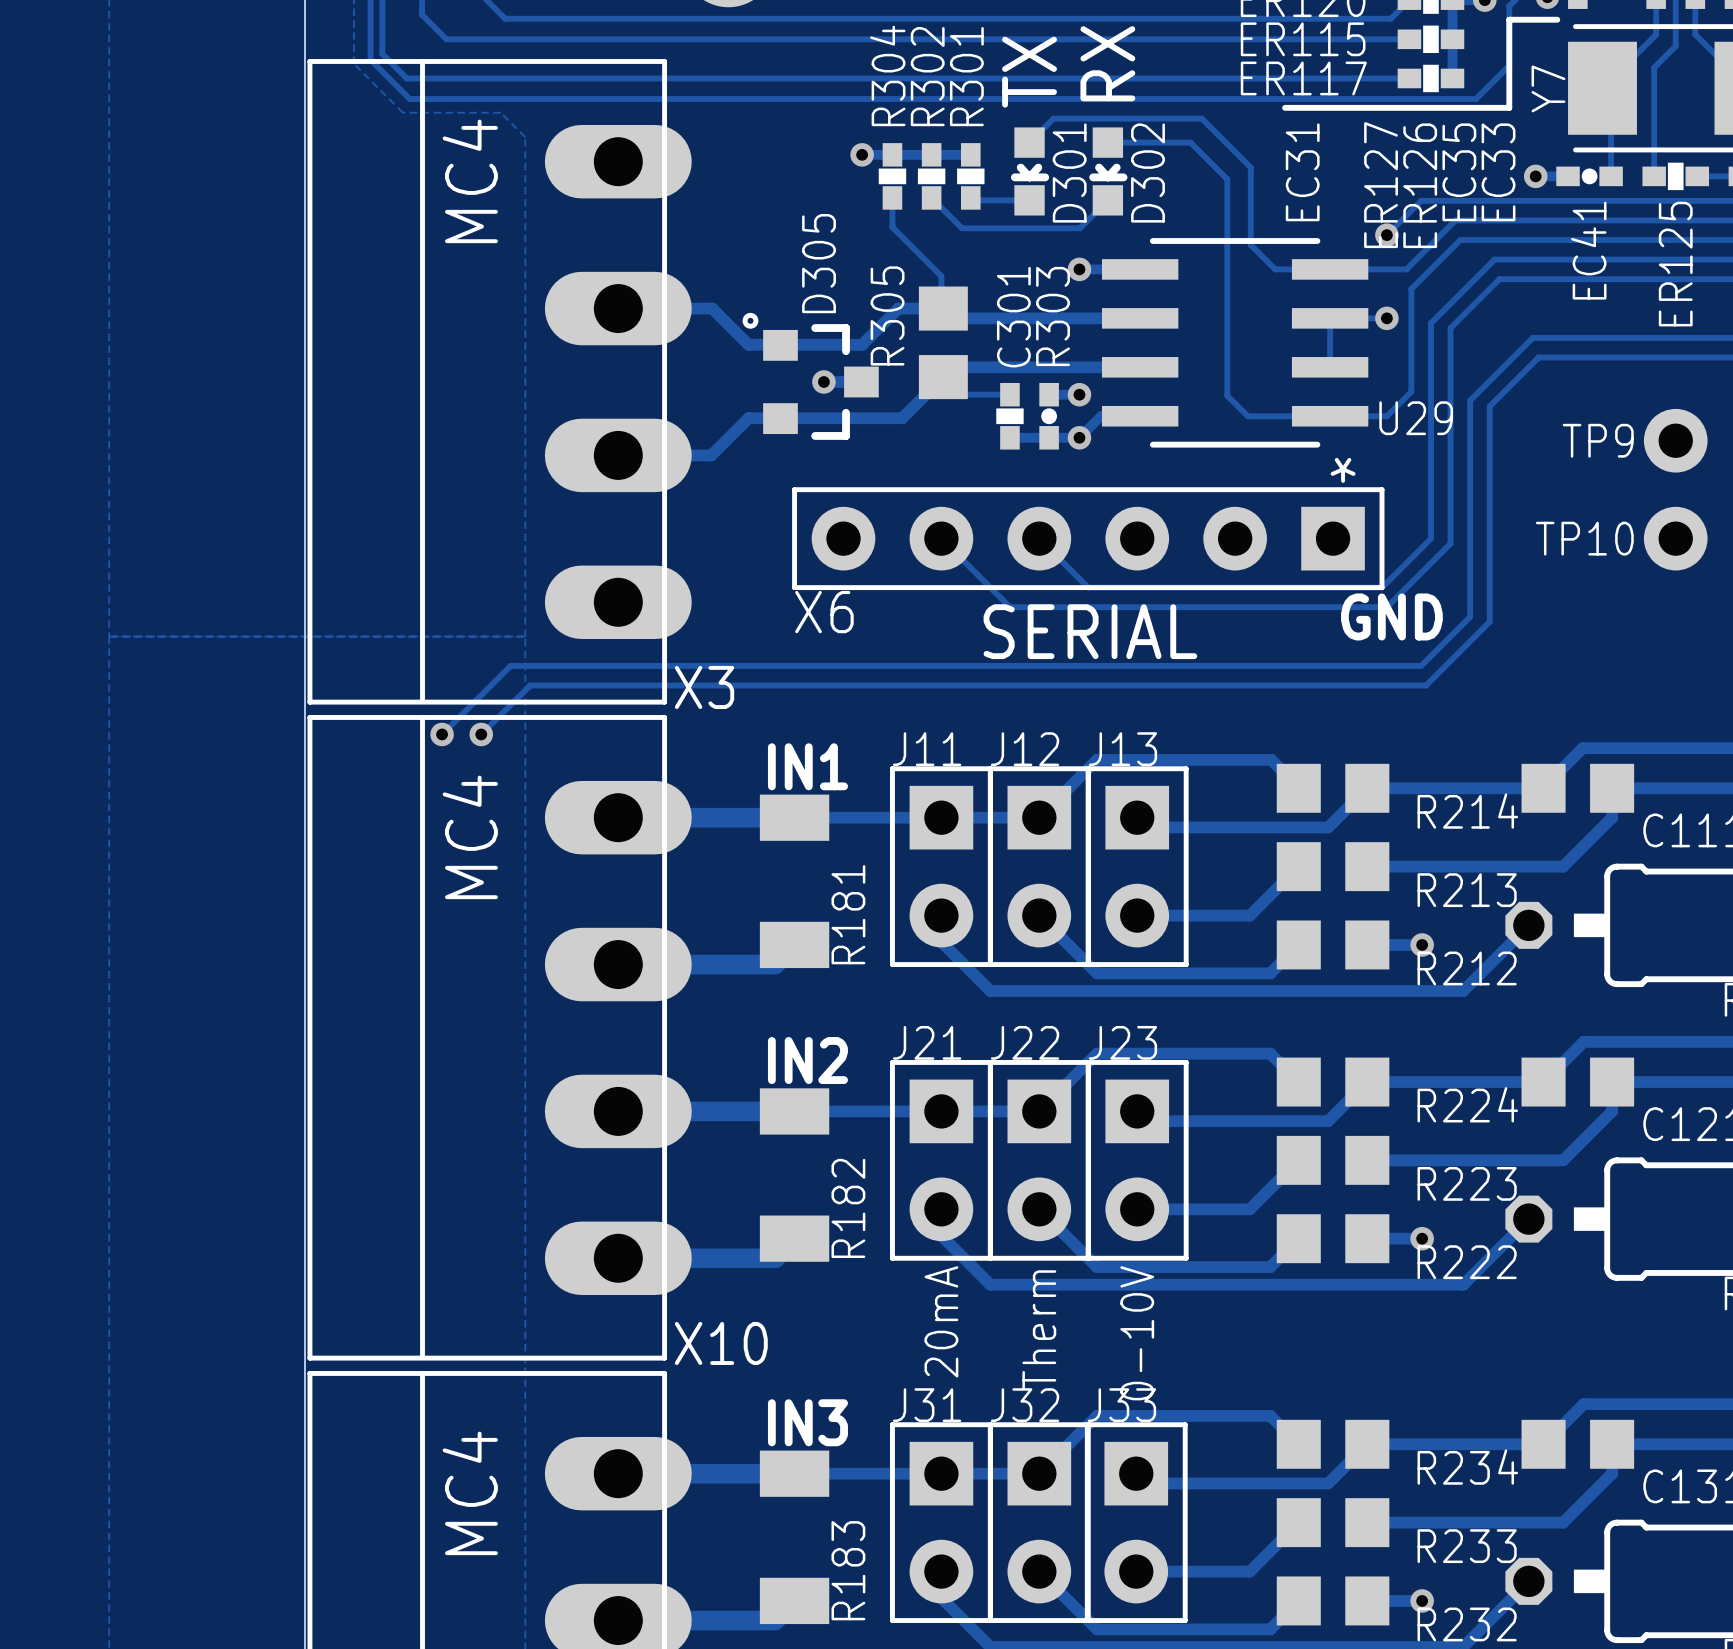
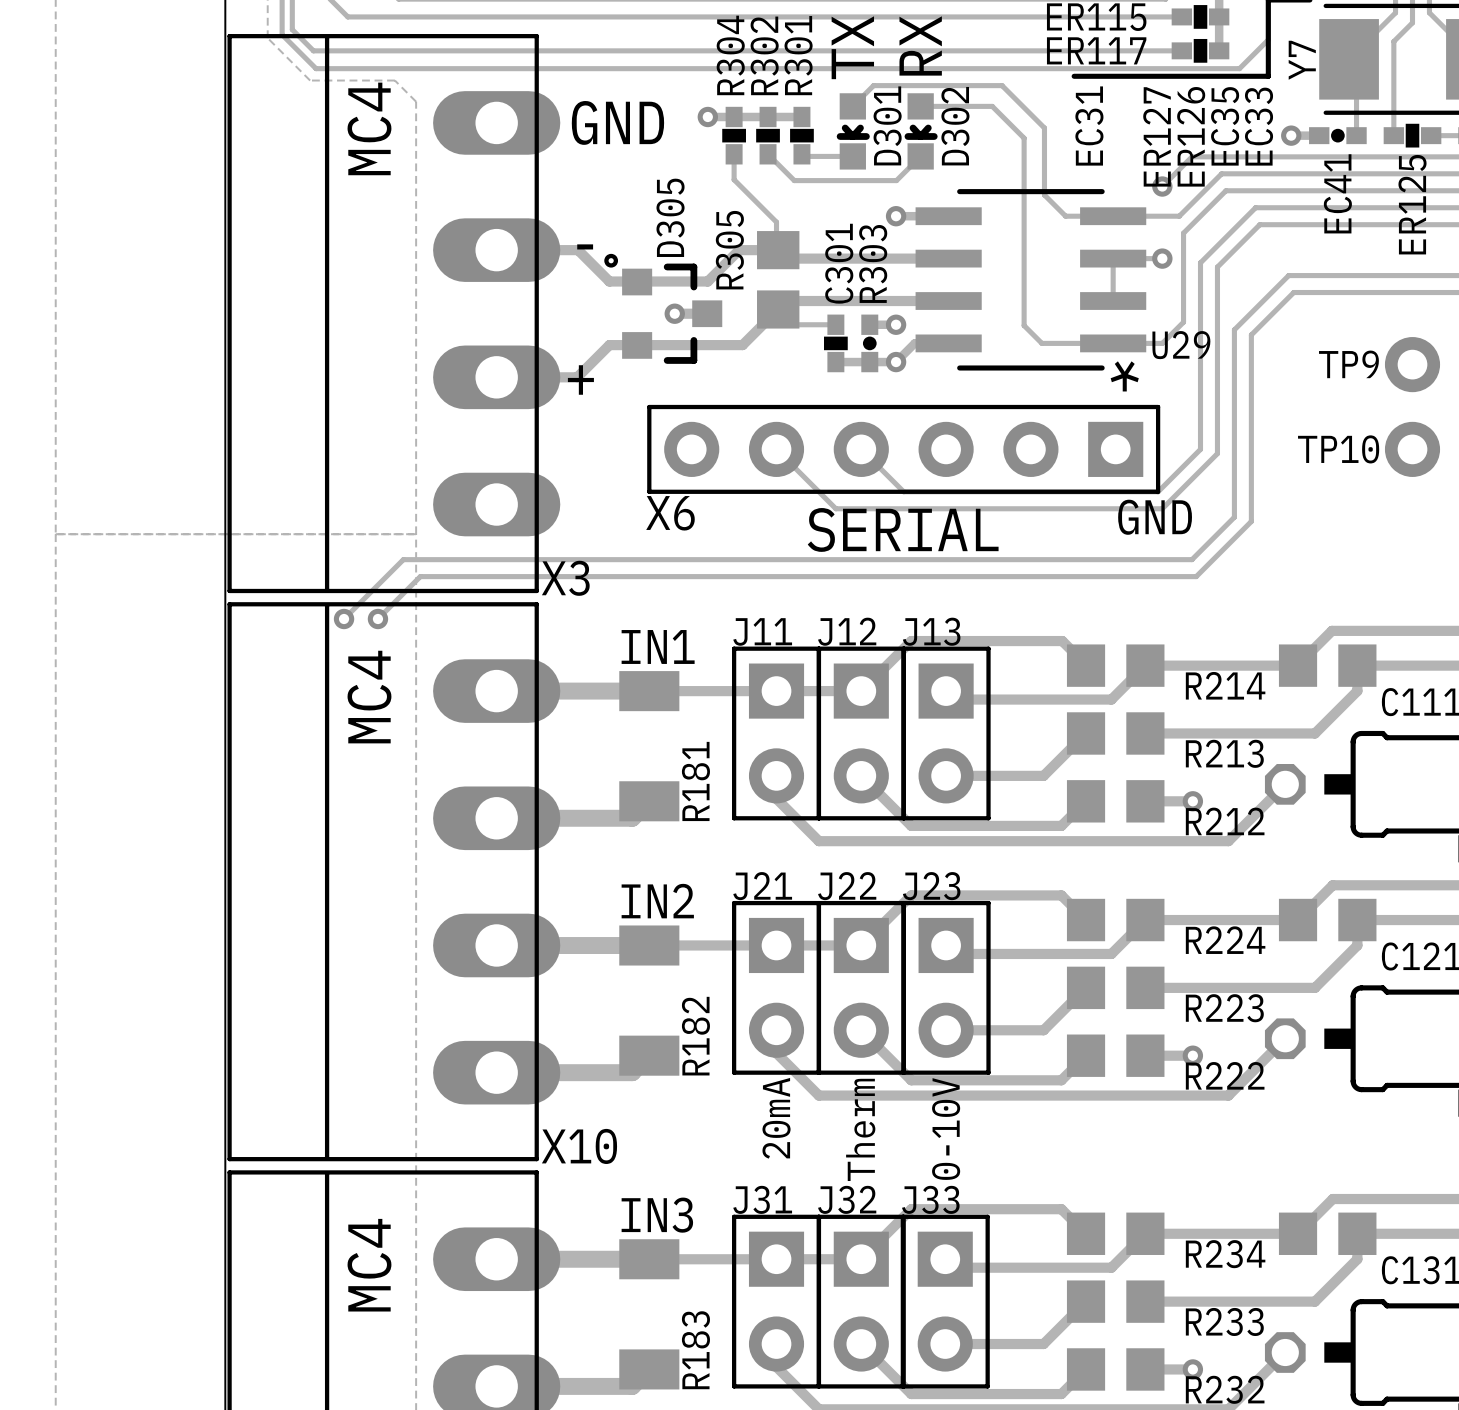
text: none -> GND (617, 122)
text: none -> - (585, 246)
text: none -> + (580, 379)

